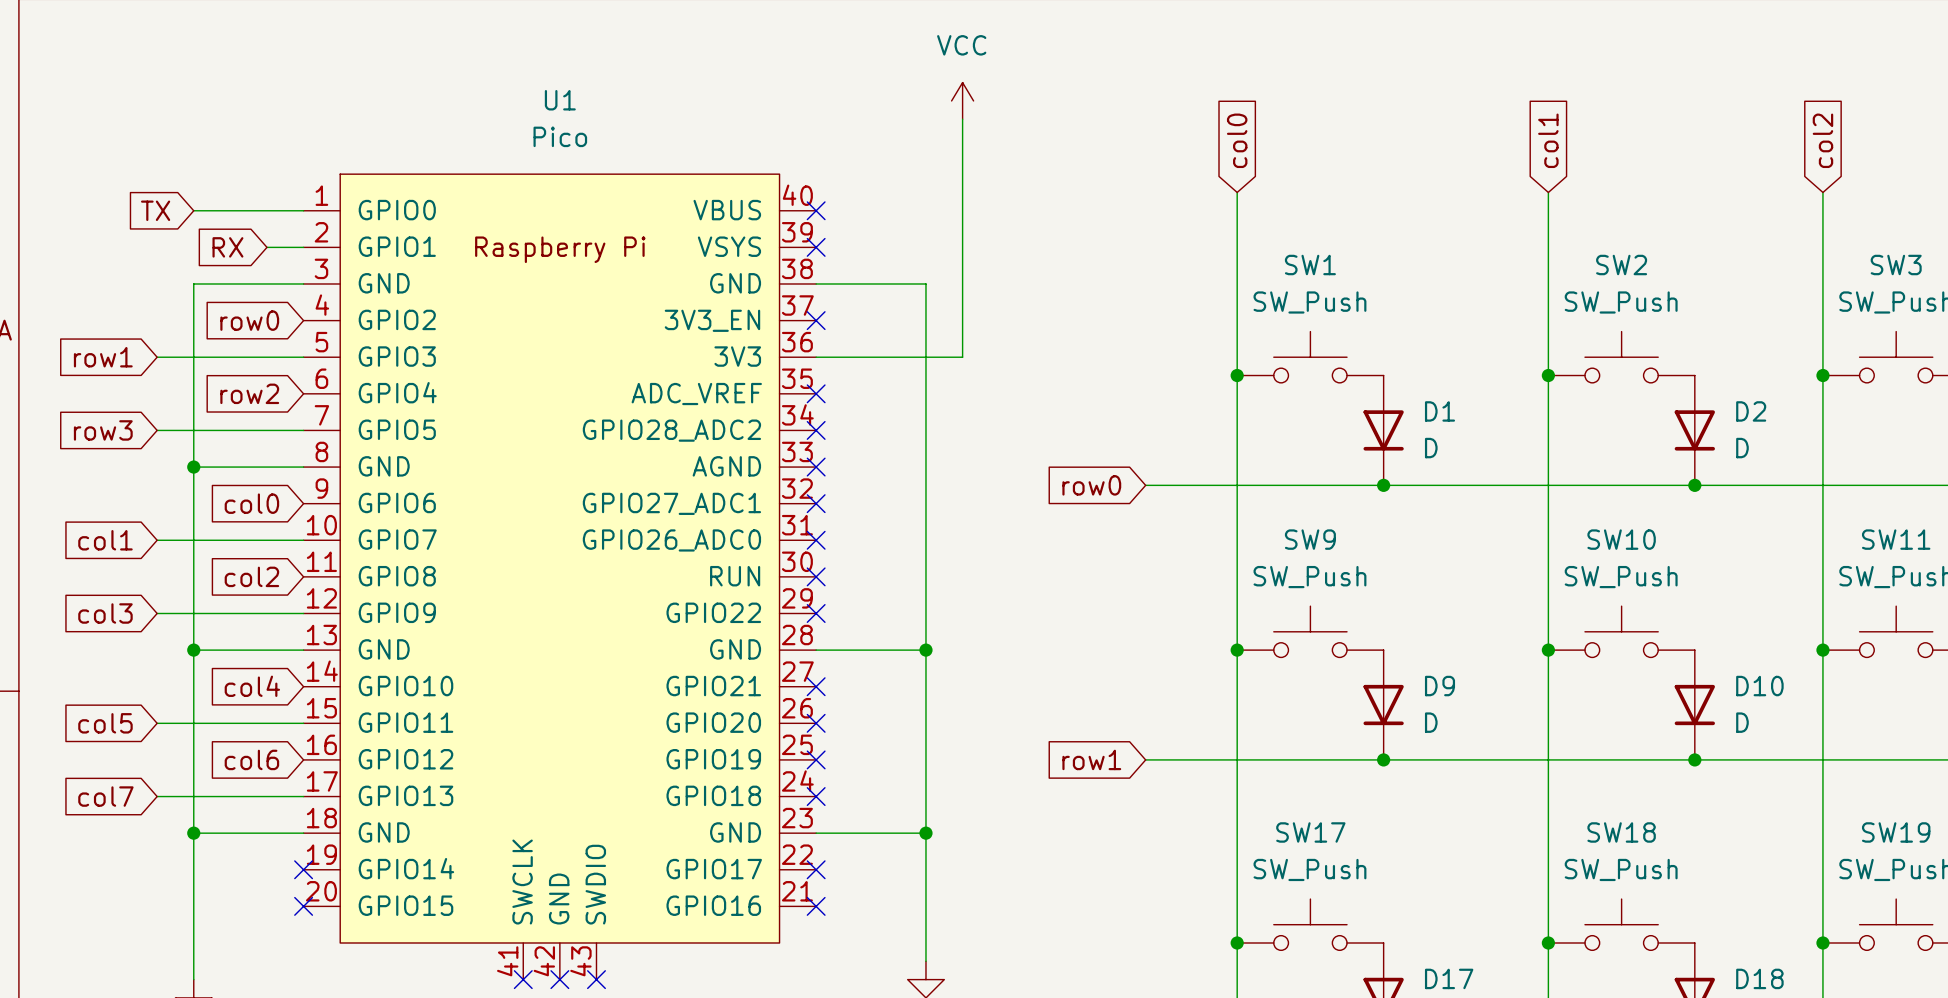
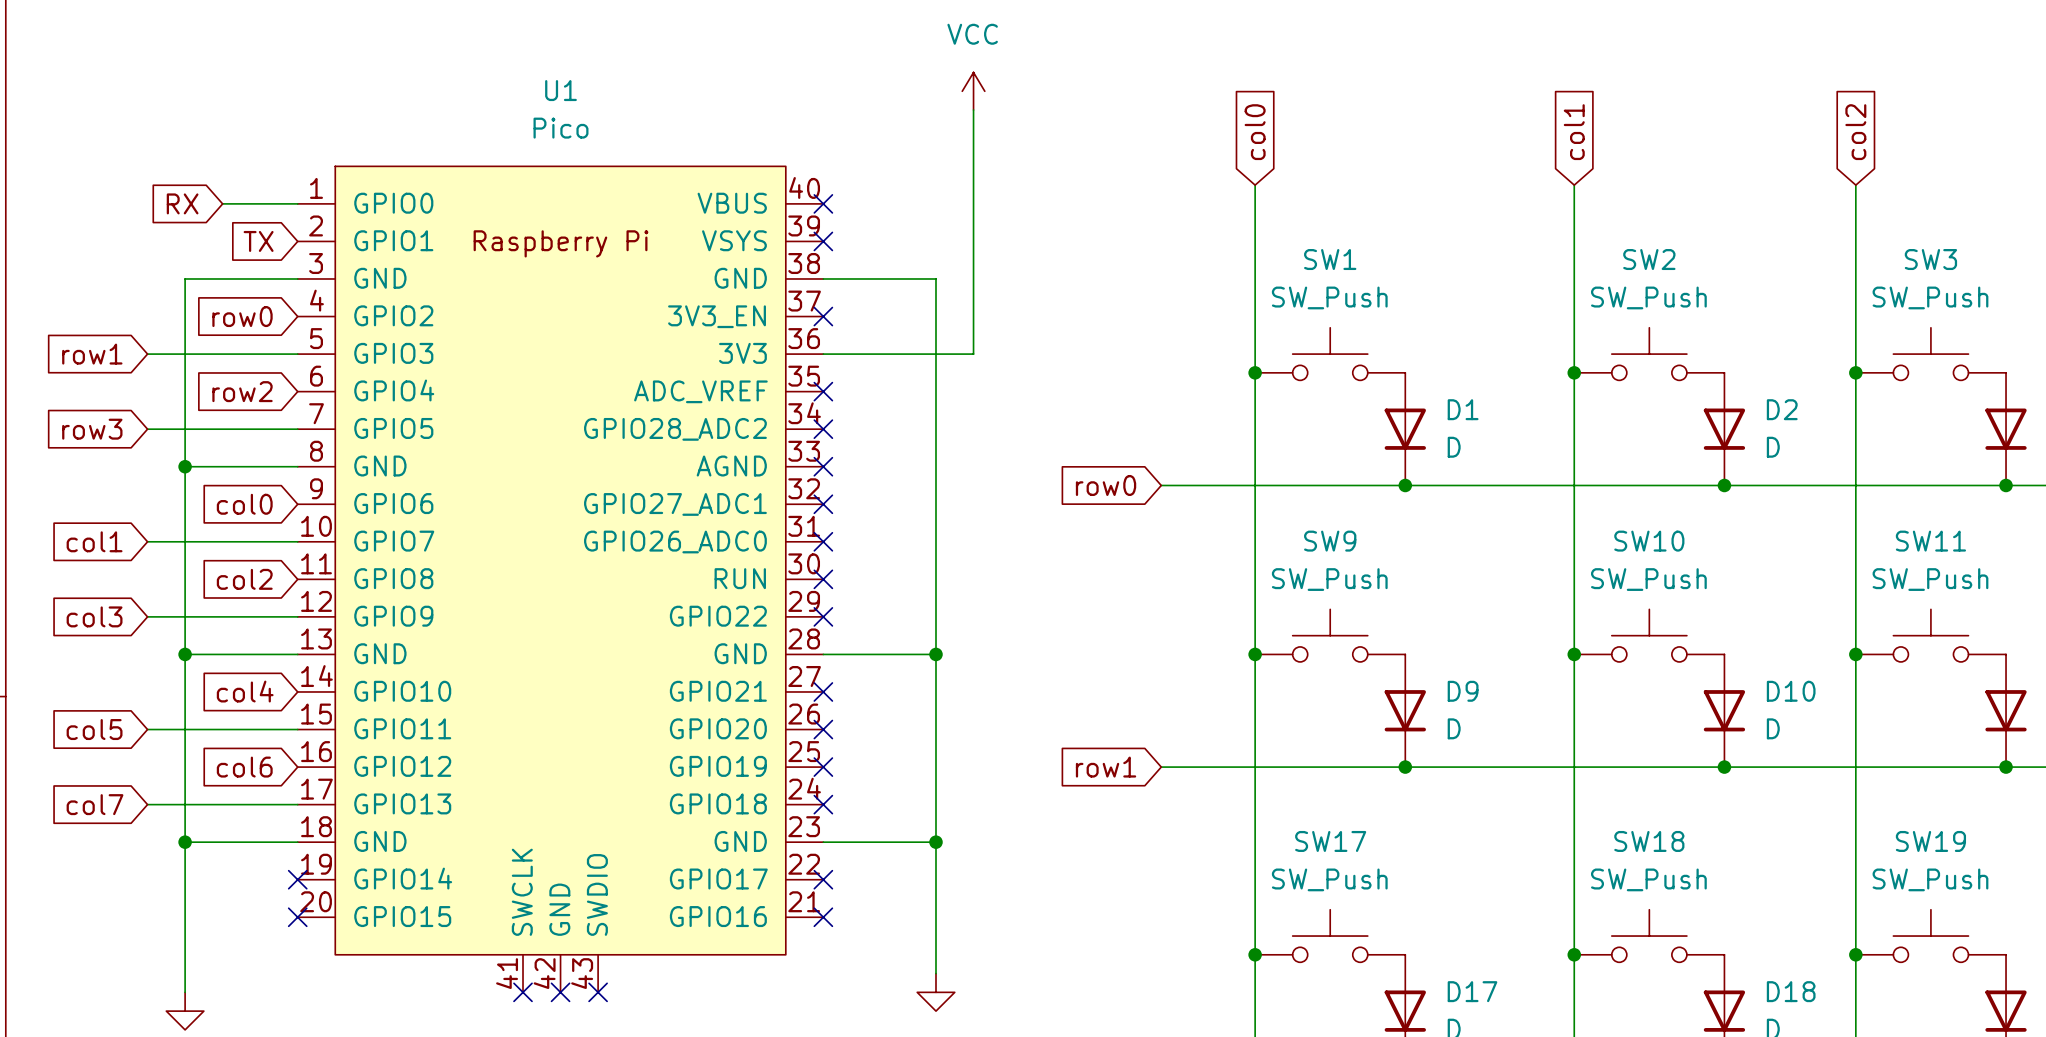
global label position: TX (155, 210) -> TX (258, 241)
wire: (193, 210) (230, 210) -> none
global label position: RX (227, 247) -> RX (182, 203)
wire: (266, 247) (303, 247) -> none

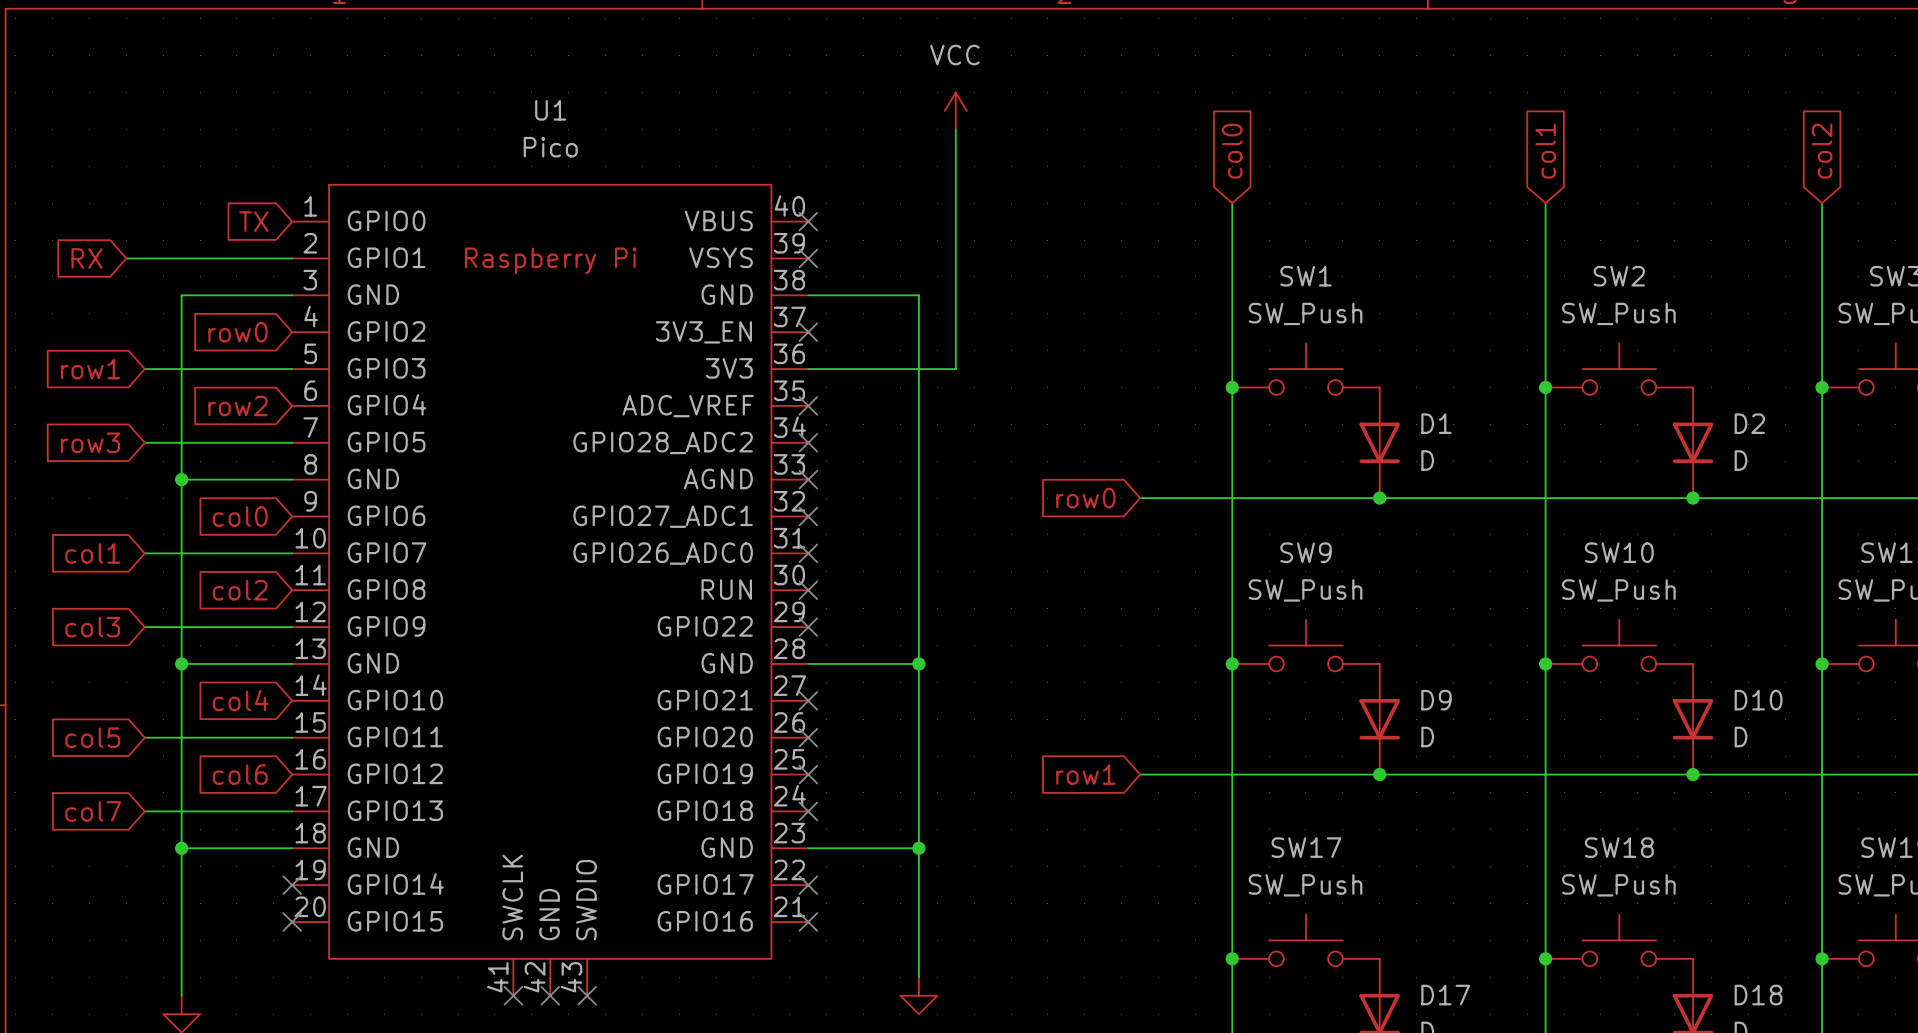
global label position: RX (182, 203) -> RX (87, 258)
wire: (222, 203) (297, 203) -> none
wire: none -> (126, 258) (292, 258)
global label position: TX (258, 241) -> TX (253, 221)

